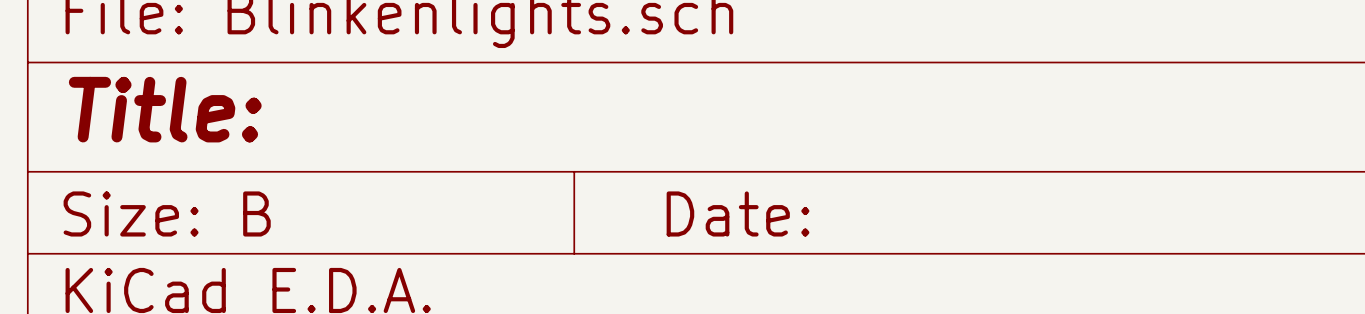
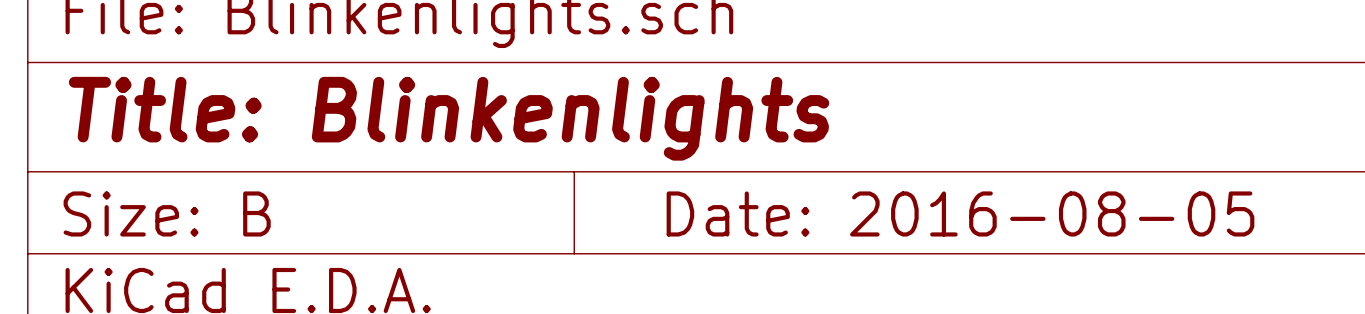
title block: Title: (165, 109) -> Title: Blinkenlights (449, 118)
title block: Date: (738, 213) -> Date: 2016-08-05 (960, 213)

